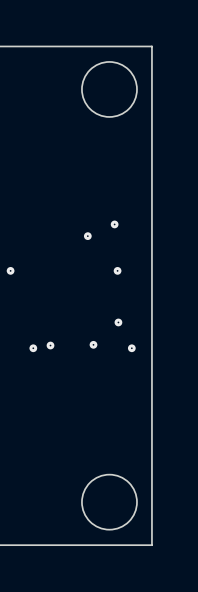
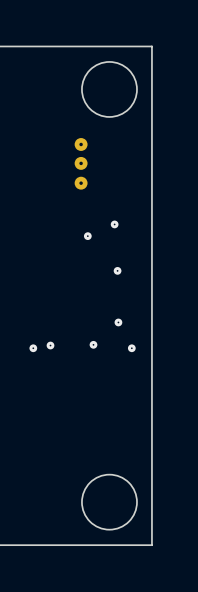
part: none -> (81, 144)
part: none -> (81, 163)
part: none -> (81, 183)
via: (10, 270) -> none

